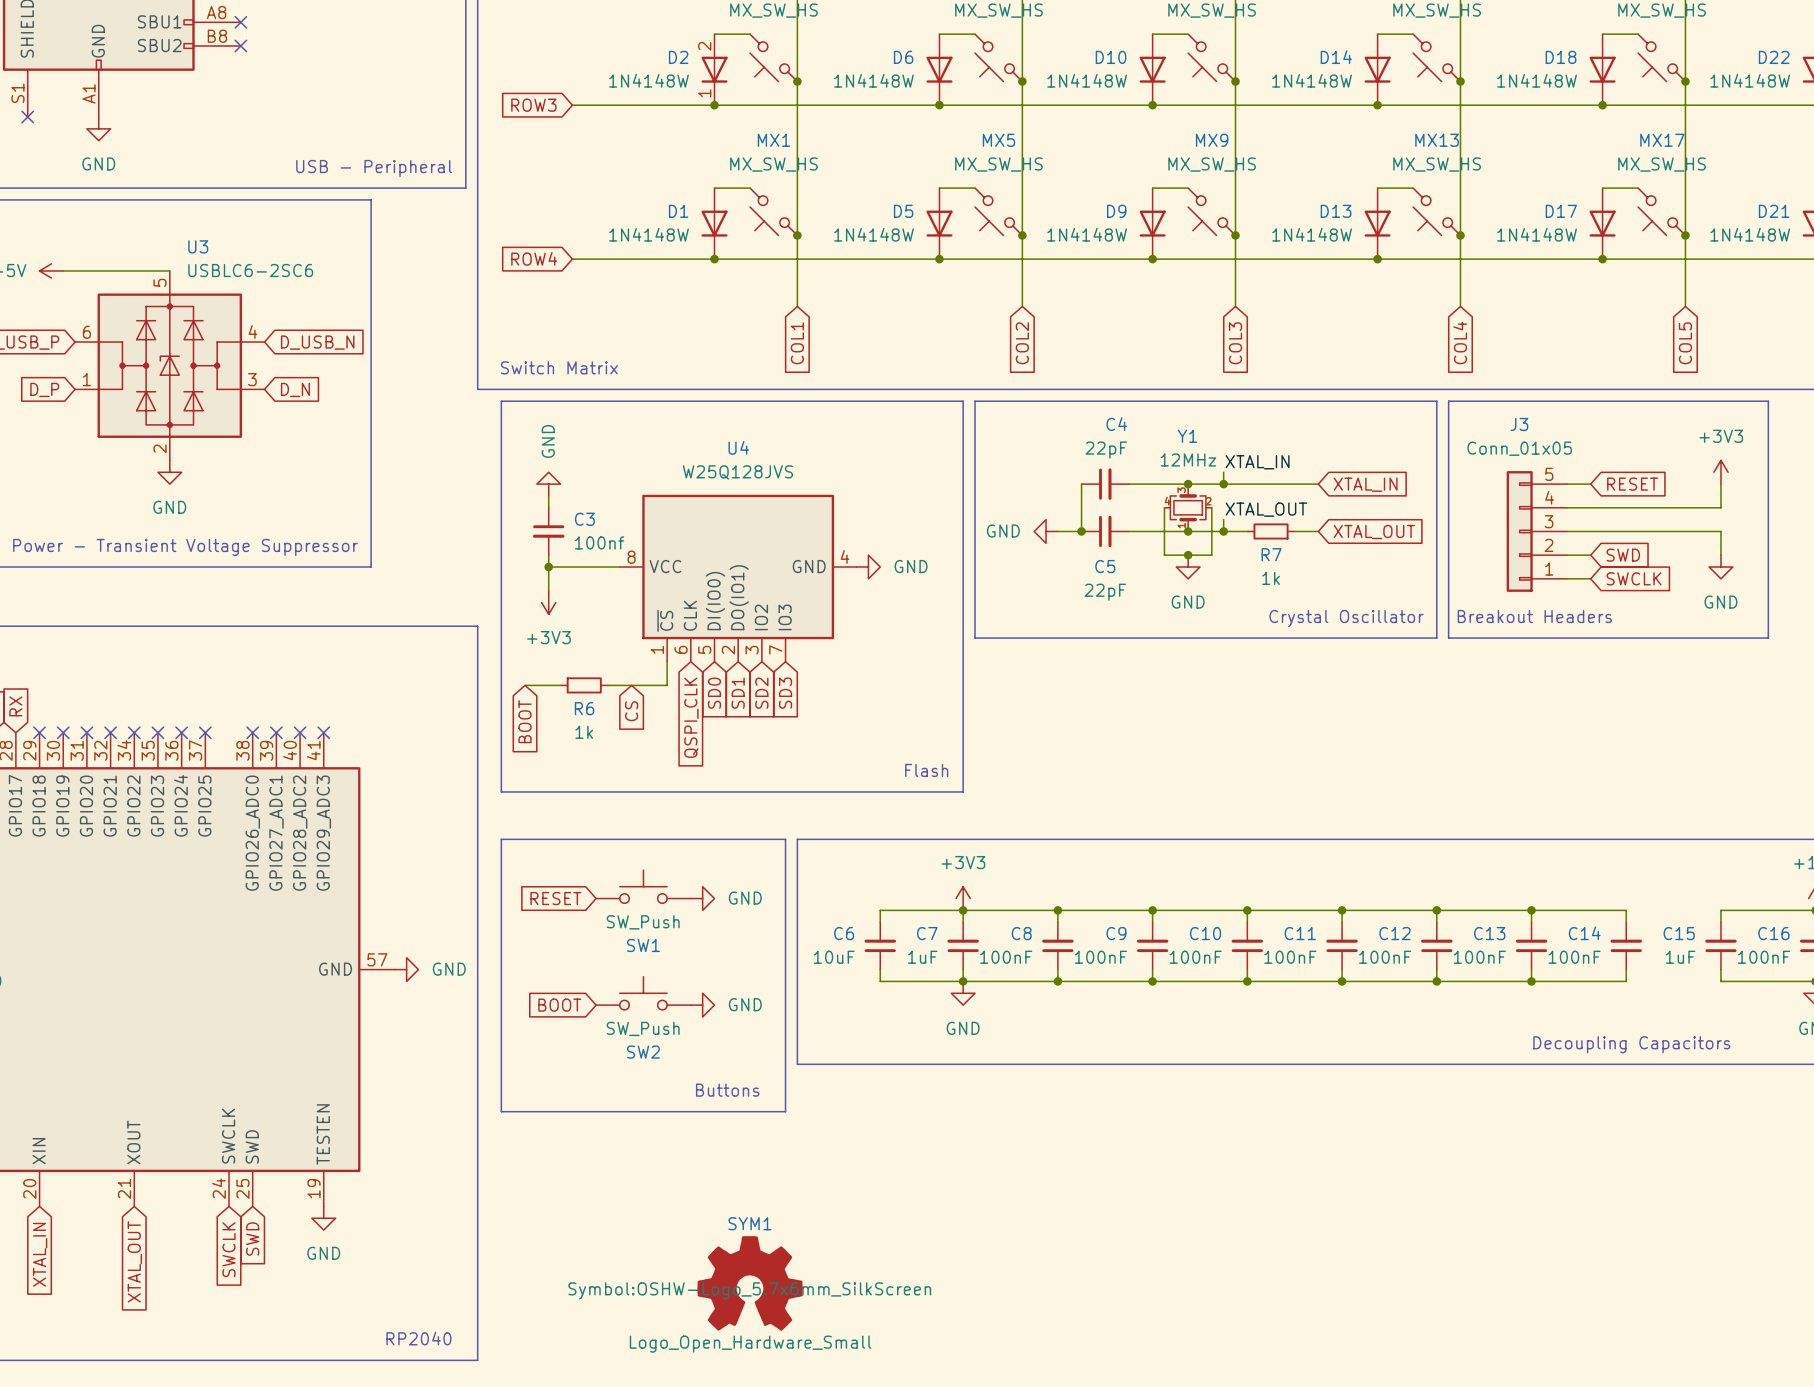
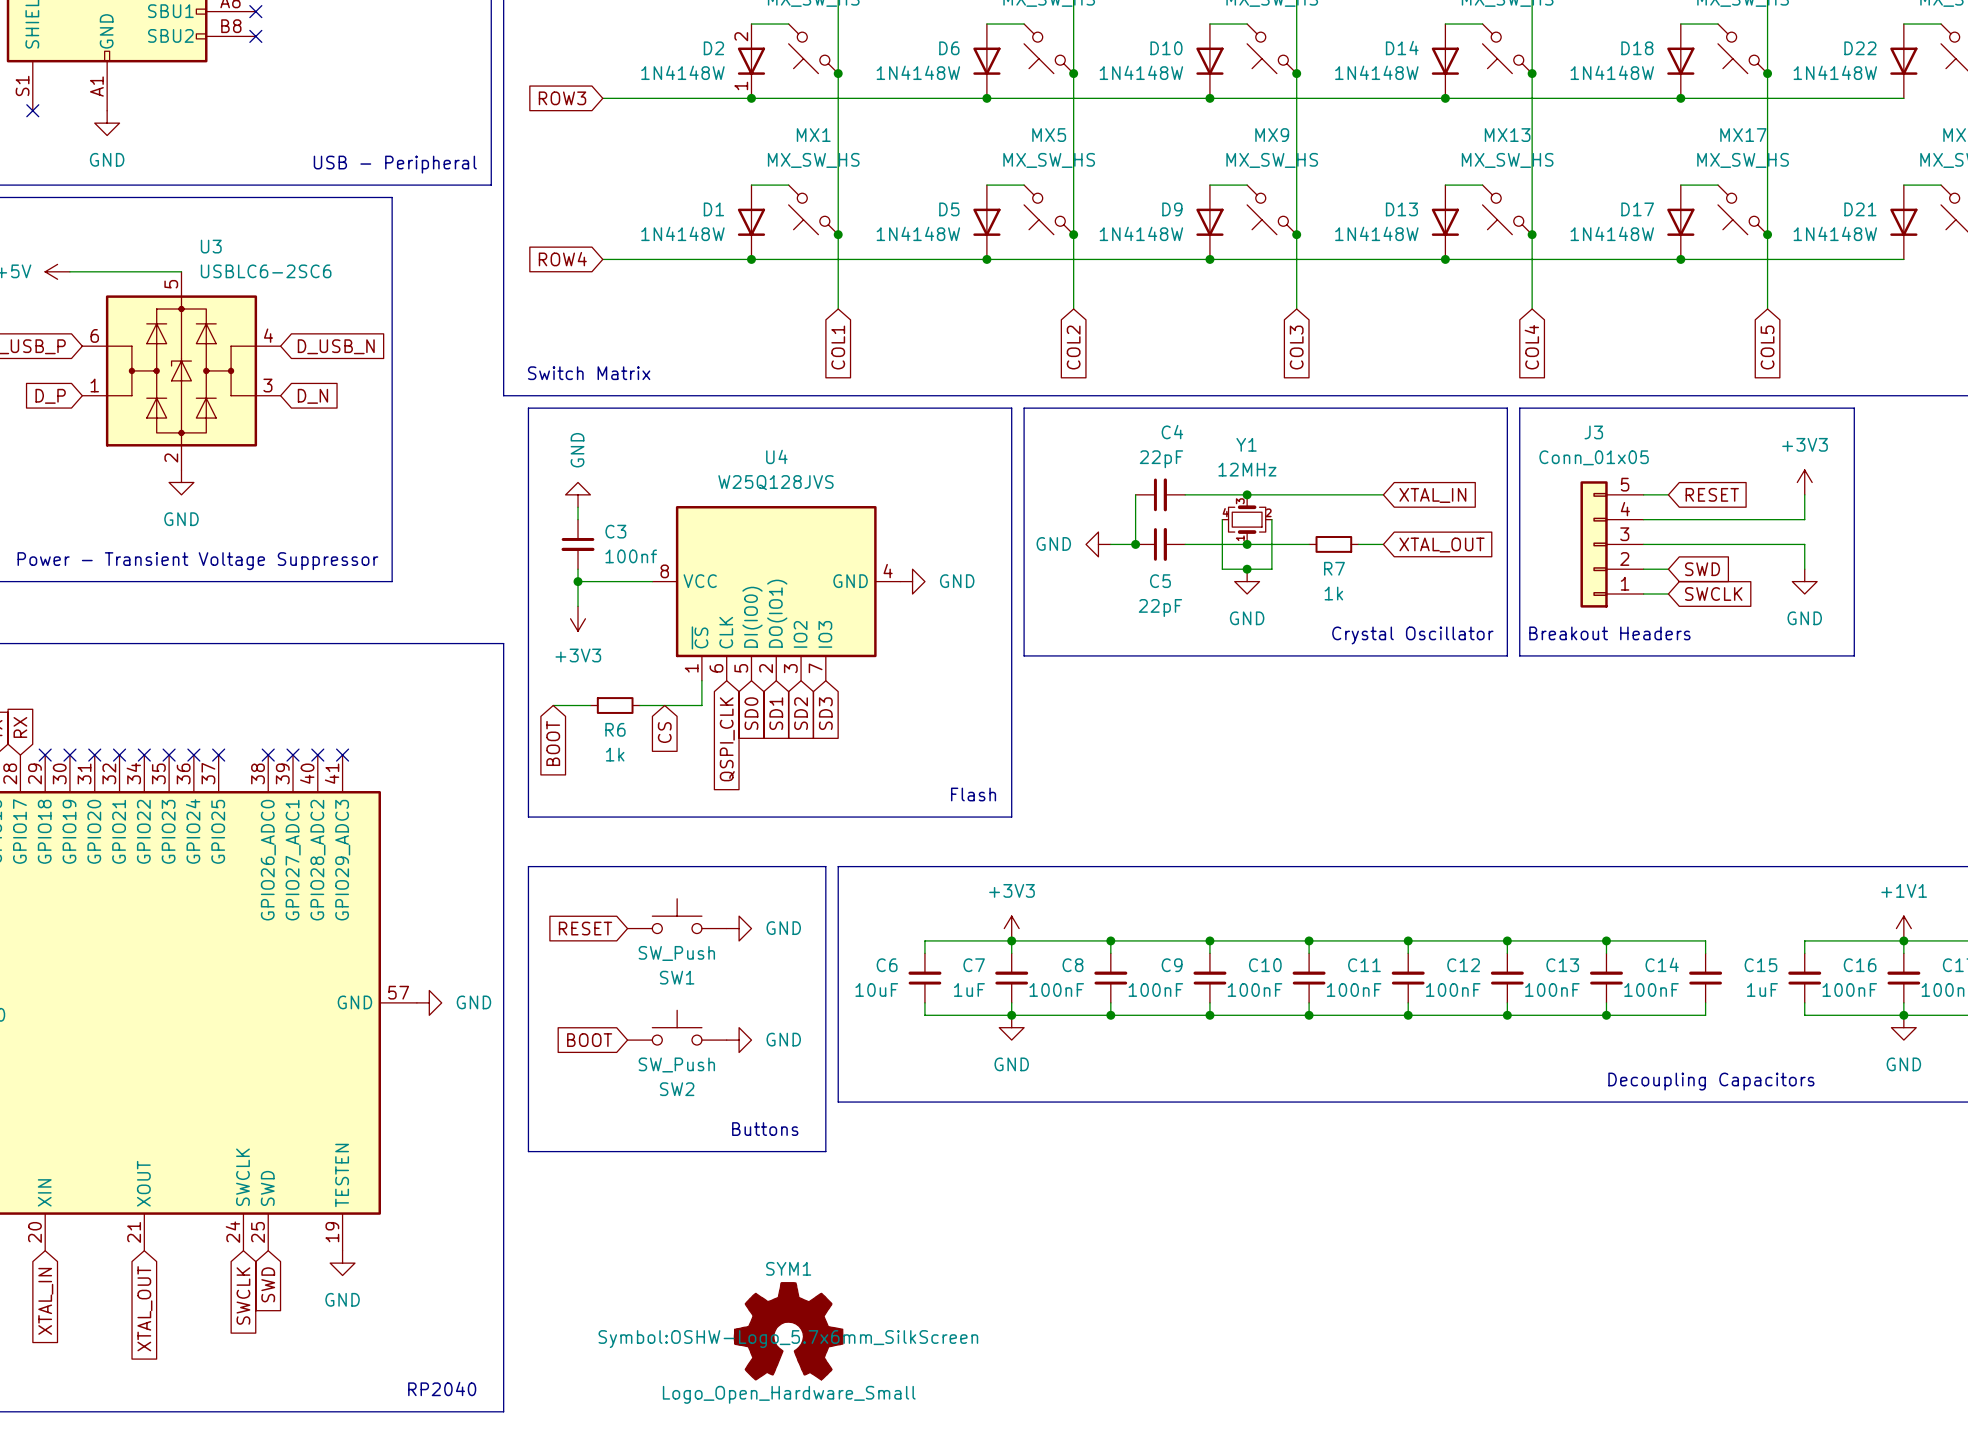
label: XTAL_IN (1257, 462) -> none
wire: (1223, 472) (1223, 484) -> none
junction: (1223, 484) -> none
label: XTAL_OUT (1266, 509) -> none
wire: (1223, 519) (1223, 531) -> none
junction: (1223, 531) -> none

